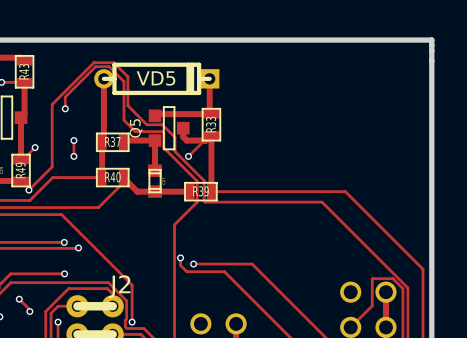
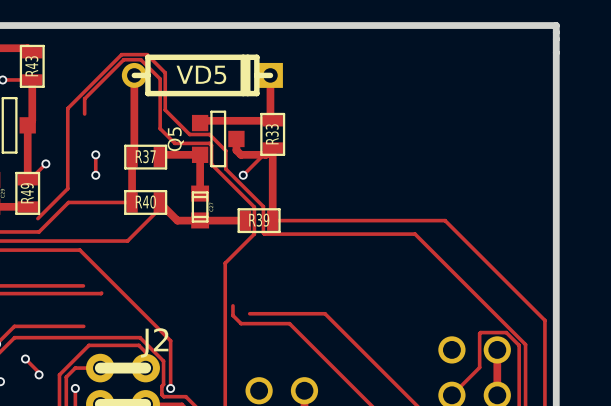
via: (65, 108) -> none
via: (28, 190) -> none
via: (64, 242) -> none
via: (78, 247) -> none
via: (180, 257) -> none
via: (193, 264) -> none
via: (64, 273) -> none

